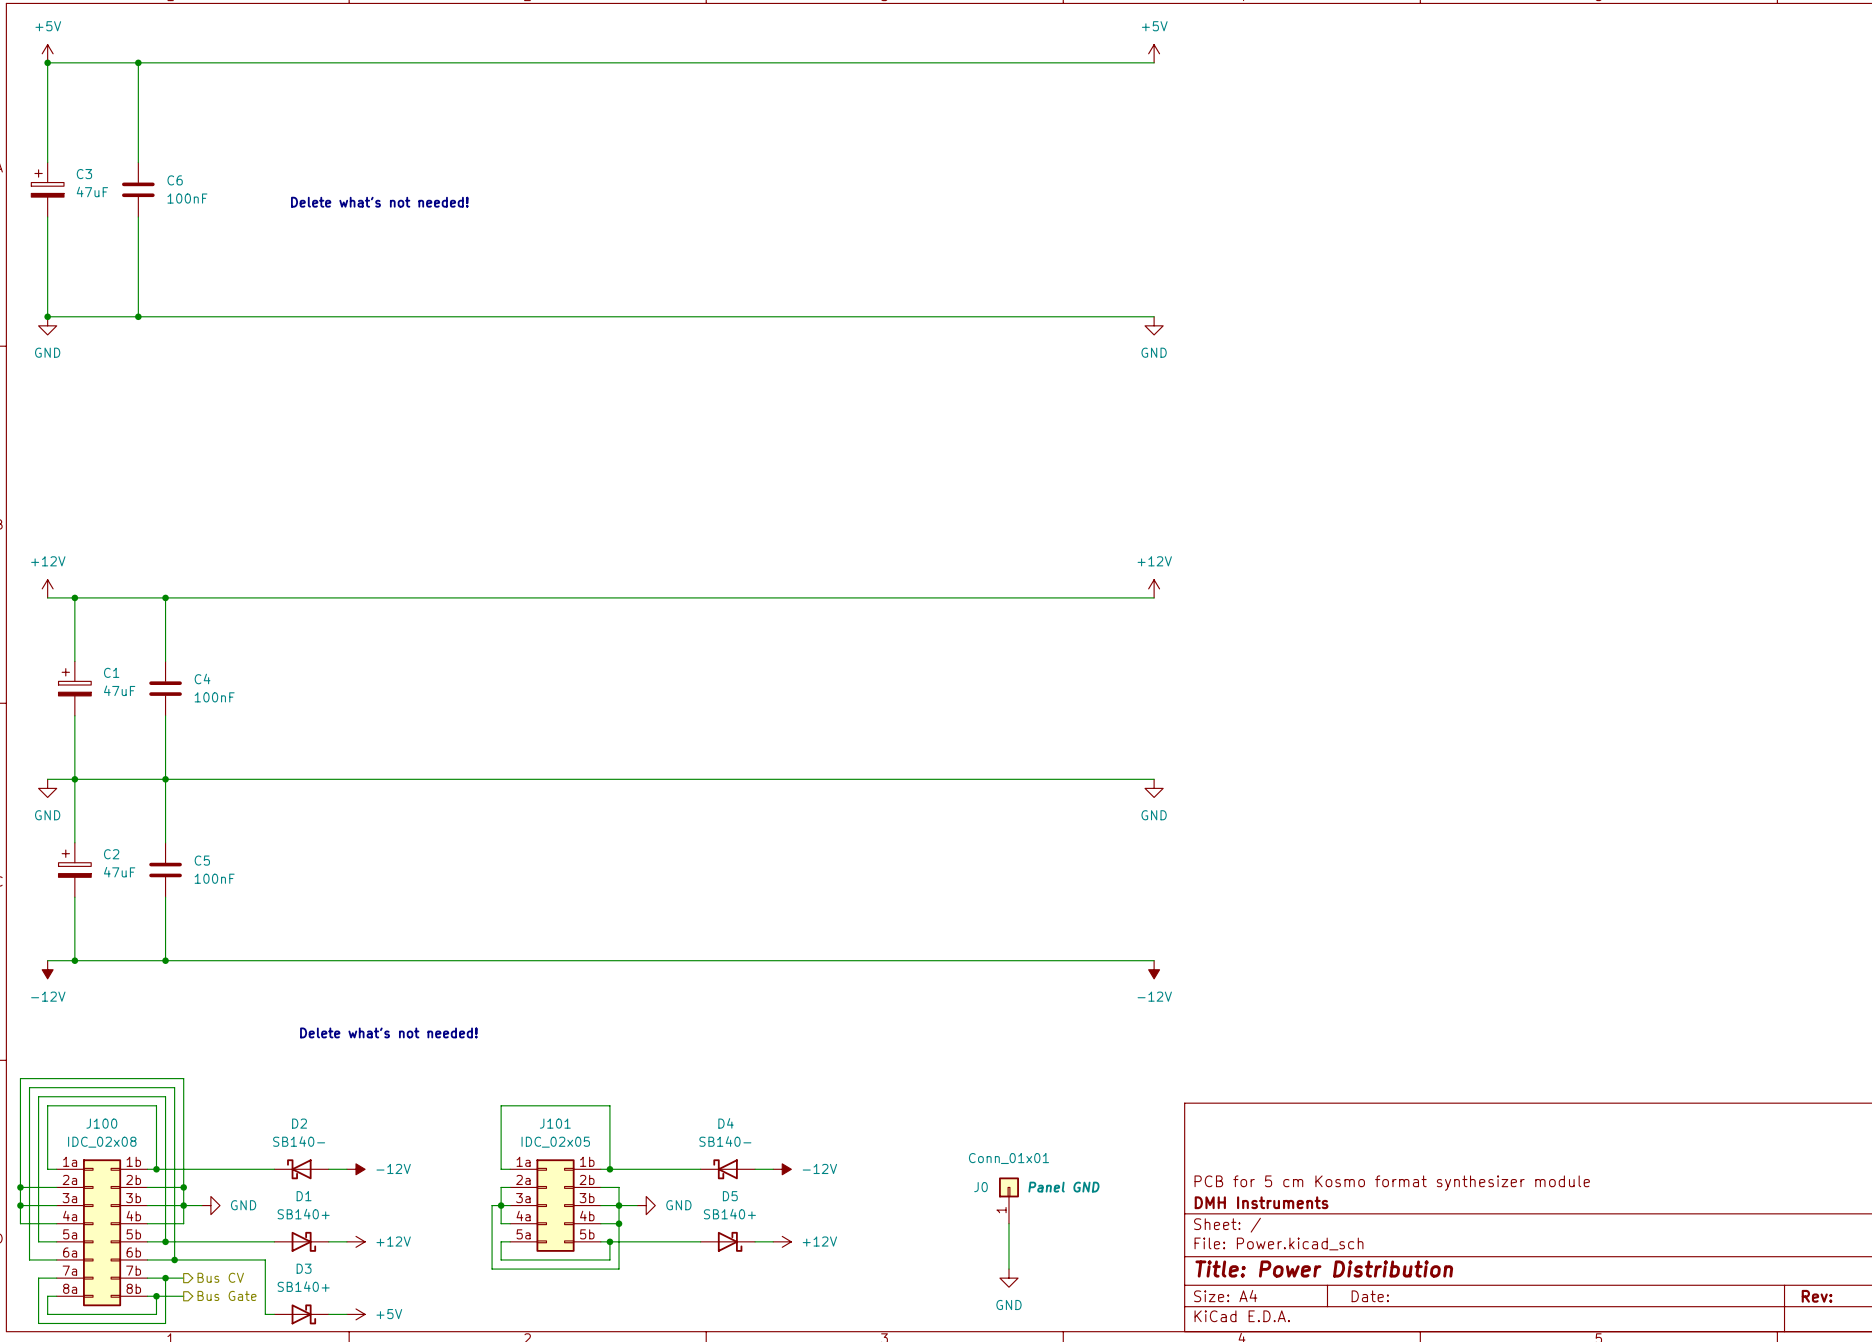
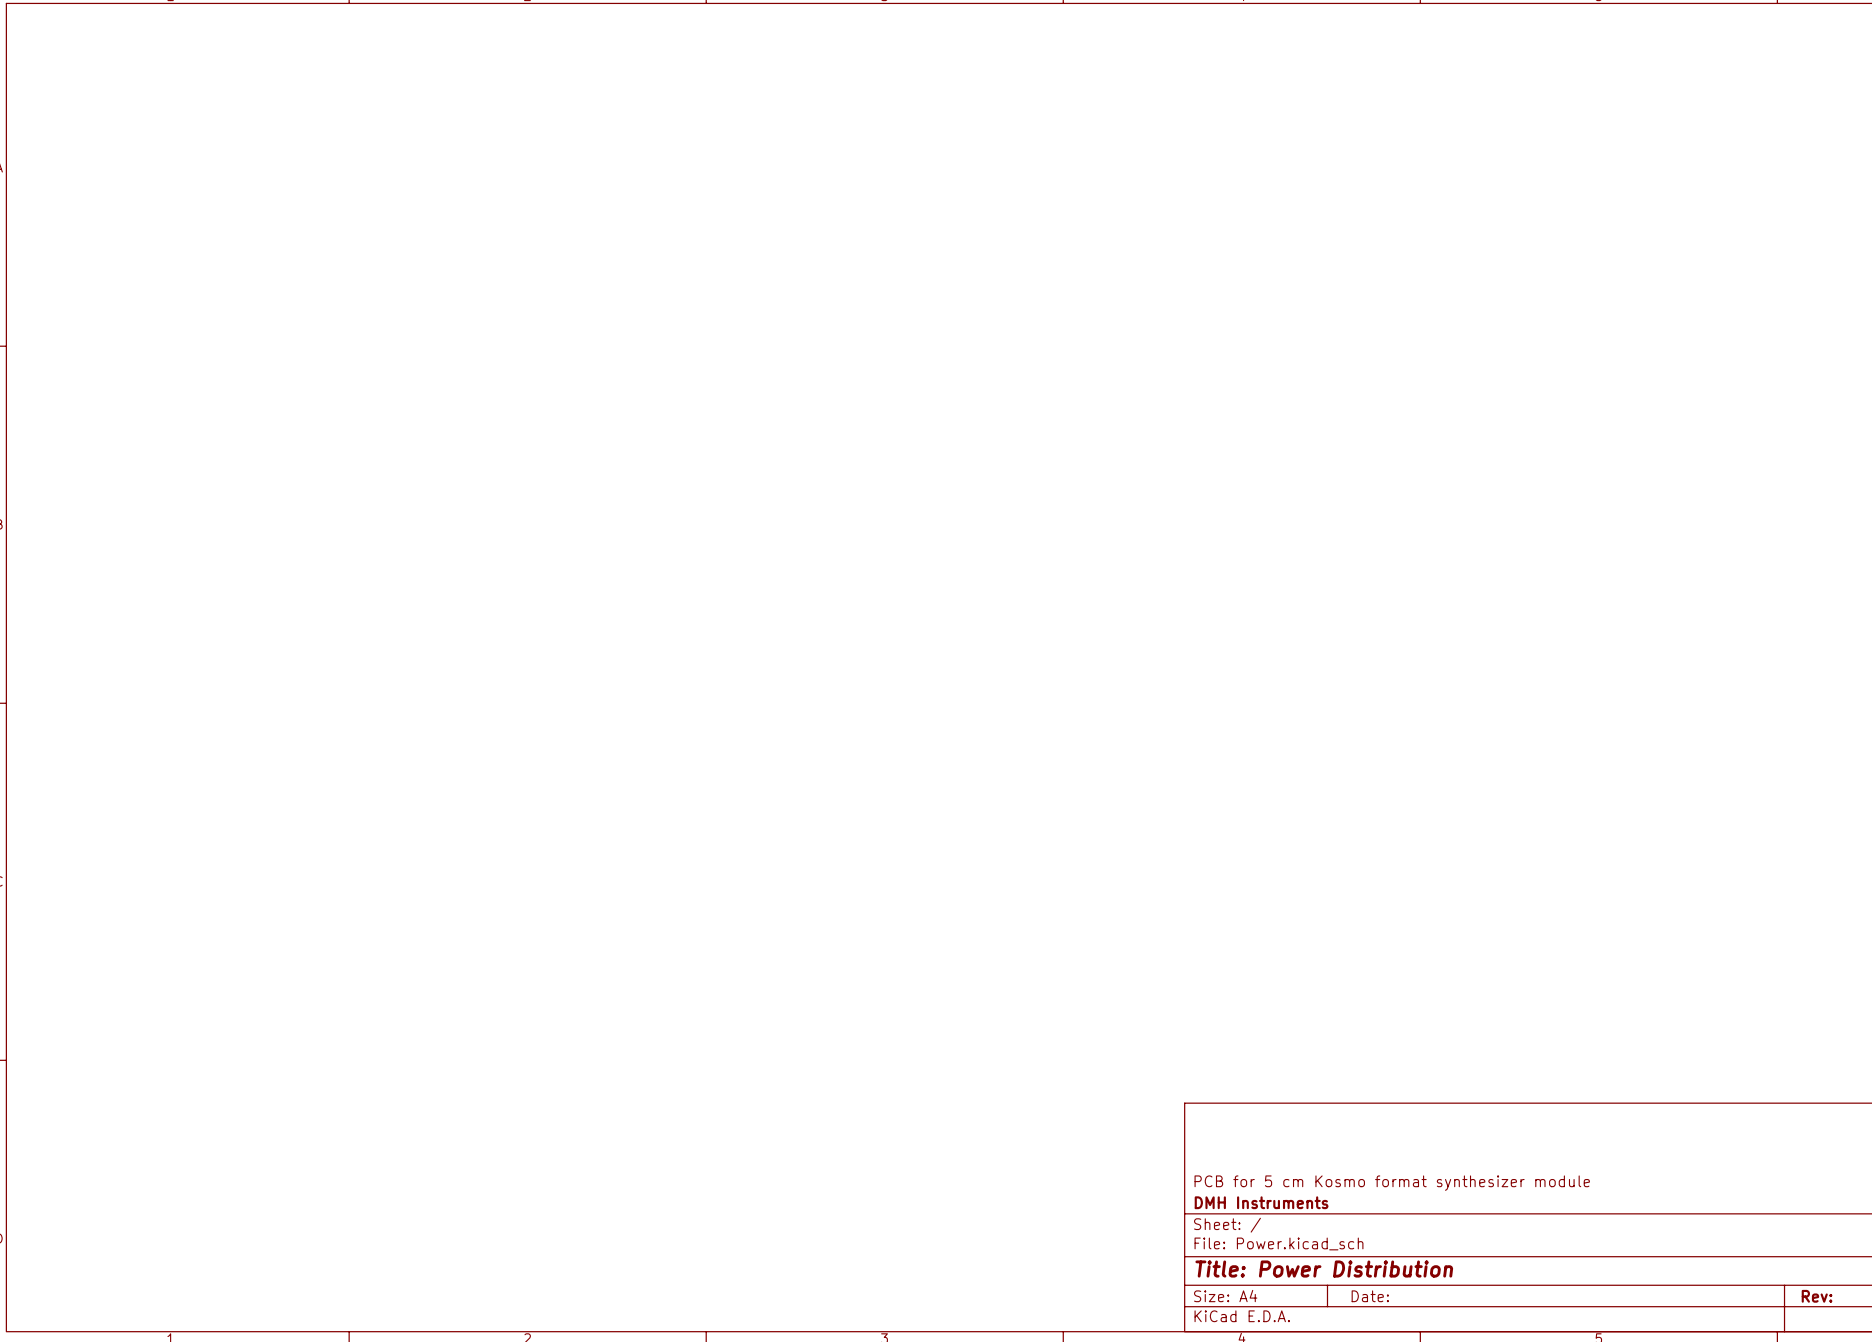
power symbol: +5V (47, 53) -> none
power symbol: +5V (1154, 53) -> none
junction: (47, 62) -> none
wire: (138, 62) (138, 162) -> none
junction: (138, 62) -> none
wire: (1154, 62) (47, 62) (47, 162) -> none
C3: 47uF (47, 189) -> none
C6: 100nF (138, 189) -> none
text: Delete what's not needed! (379, 202) -> none
wire: (47, 217) (47, 316) (1154, 316) -> none
wire: (138, 217) (138, 316) -> none
junction: (47, 316) -> none
junction: (138, 316) -> none
power symbol: GND (47, 325) -> none
power symbol: GND (1154, 325) -> none
power symbol: +12V (47, 588) -> none
power symbol: +12V (1154, 588) -> none
wire: (47, 597) (1154, 597) -> none
wire: (74, 597) (74, 661) -> none
junction: (74, 597) -> none
wire: (165, 597) (165, 661) -> none
junction: (165, 597) -> none
C1: 47uF (74, 688) -> none
C4: 100nF (165, 688) -> none
wire: (74, 715) (74, 842) -> none
wire: (165, 715) (165, 842) -> none
wire: (47, 779) (1154, 779) -> none
junction: (74, 779) -> none
junction: (165, 779) -> none
power symbol: GND (47, 788) -> none
power symbol: GND (1154, 788) -> none
C2: 47uF (74, 870) -> none
C5: 100nF (165, 870) -> none
wire: (74, 897) (74, 960) -> none
wire: (165, 897) (165, 960) -> none
wire: (47, 960) (1154, 960) -> none
junction: (74, 960) -> none
junction: (165, 960) -> none
power symbol: -12V (47, 969) -> none
power symbol: -12V (1154, 969) -> none
text: Delete what's not needed! (388, 1032) -> none
wire: (56, 1169) (47, 1169) (47, 1105) (156, 1105) (156, 1169) -> none
wire: (147, 1169) (274, 1169) -> none
junction: (156, 1169) -> none
D2: SB140- (301, 1169) -> none
wire: (328, 1169) (346, 1169) -> none
power symbol: -12V (356, 1169) -> none
wire: (510, 1169) (501, 1169) (501, 1105) (609, 1105) (609, 1169) -> none
wire: (600, 1169) (700, 1169) -> none
junction: (609, 1169) -> none
D4: SB140- (727, 1169) -> none
wire: (755, 1169) (773, 1169) -> none
power symbol: -12V (782, 1169) -> none
wire: (20, 1187) (56, 1187) -> none
junction: (20, 1187) -> none
wire: (147, 1187) (183, 1187) -> none
junction: (183, 1187) -> none
wire: (510, 1187) (501, 1187) (501, 1223) (510, 1223) -> none
wire: (600, 1187) (619, 1187) (619, 1269) (492, 1269) (492, 1205) (510, 1205) -> none
J0: Conn_01x01 (1008, 1200) -> none
wire: (20, 1205) (56, 1205) -> none
junction: (20, 1205) -> none
wire: (147, 1205) (201, 1205) -> none
junction: (183, 1205) -> none
power symbol: GND (210, 1205) -> none
junction: (501, 1205) -> none
J101: IDC_02x05 (555, 1205) -> none
wire: (600, 1205) (637, 1205) -> none
junction: (619, 1205) -> none
power symbol: GND (646, 1205) -> none
wire: (56, 1223) (20, 1223) (20, 1078) (183, 1078) (183, 1223) (147, 1223) -> none
wire: (600, 1223) (619, 1223) -> none
junction: (619, 1223) -> none
wire: (1008, 1223) (1008, 1269) -> none
J100: IDC_02x08 (102, 1232) -> none
wire: (56, 1241) (38, 1241) (38, 1096) (165, 1096) (165, 1241) -> none
wire: (147, 1241) (274, 1241) -> none
junction: (165, 1241) -> none
D1: SB140+ (301, 1241) -> none
wire: (328, 1241) (346, 1241) -> none
power symbol: +12V (356, 1241) -> none
wire: (510, 1241) (501, 1241) (501, 1259) (609, 1259) (609, 1241) -> none
wire: (600, 1241) (700, 1241) -> none
junction: (609, 1241) -> none
D5: SB140+ (727, 1241) -> none
wire: (755, 1241) (773, 1241) -> none
power symbol: +12V (782, 1241) -> none
wire: (56, 1259) (29, 1259) (29, 1087) (174, 1087) (174, 1259) -> none
wire: (147, 1259) (265, 1259) (265, 1314) (274, 1314) -> none
junction: (174, 1259) -> none
hierarchical label: Bus CV (220, 1277) -> none
wire: (56, 1278) (38, 1278) (38, 1323) (165, 1323) (165, 1278) -> none
wire: (147, 1278) (183, 1278) -> none
junction: (165, 1278) -> none
power symbol: GND (1008, 1278) -> none
hierarchical label: Bus Gate (227, 1295) -> none
wire: (56, 1296) (47, 1296) (47, 1314) (156, 1314) (156, 1296) -> none
wire: (147, 1296) (183, 1296) -> none
junction: (156, 1296) -> none
D3: SB140+ (301, 1314) -> none
wire: (328, 1314) (346, 1314) -> none
power symbol: +5V (356, 1314) -> none

